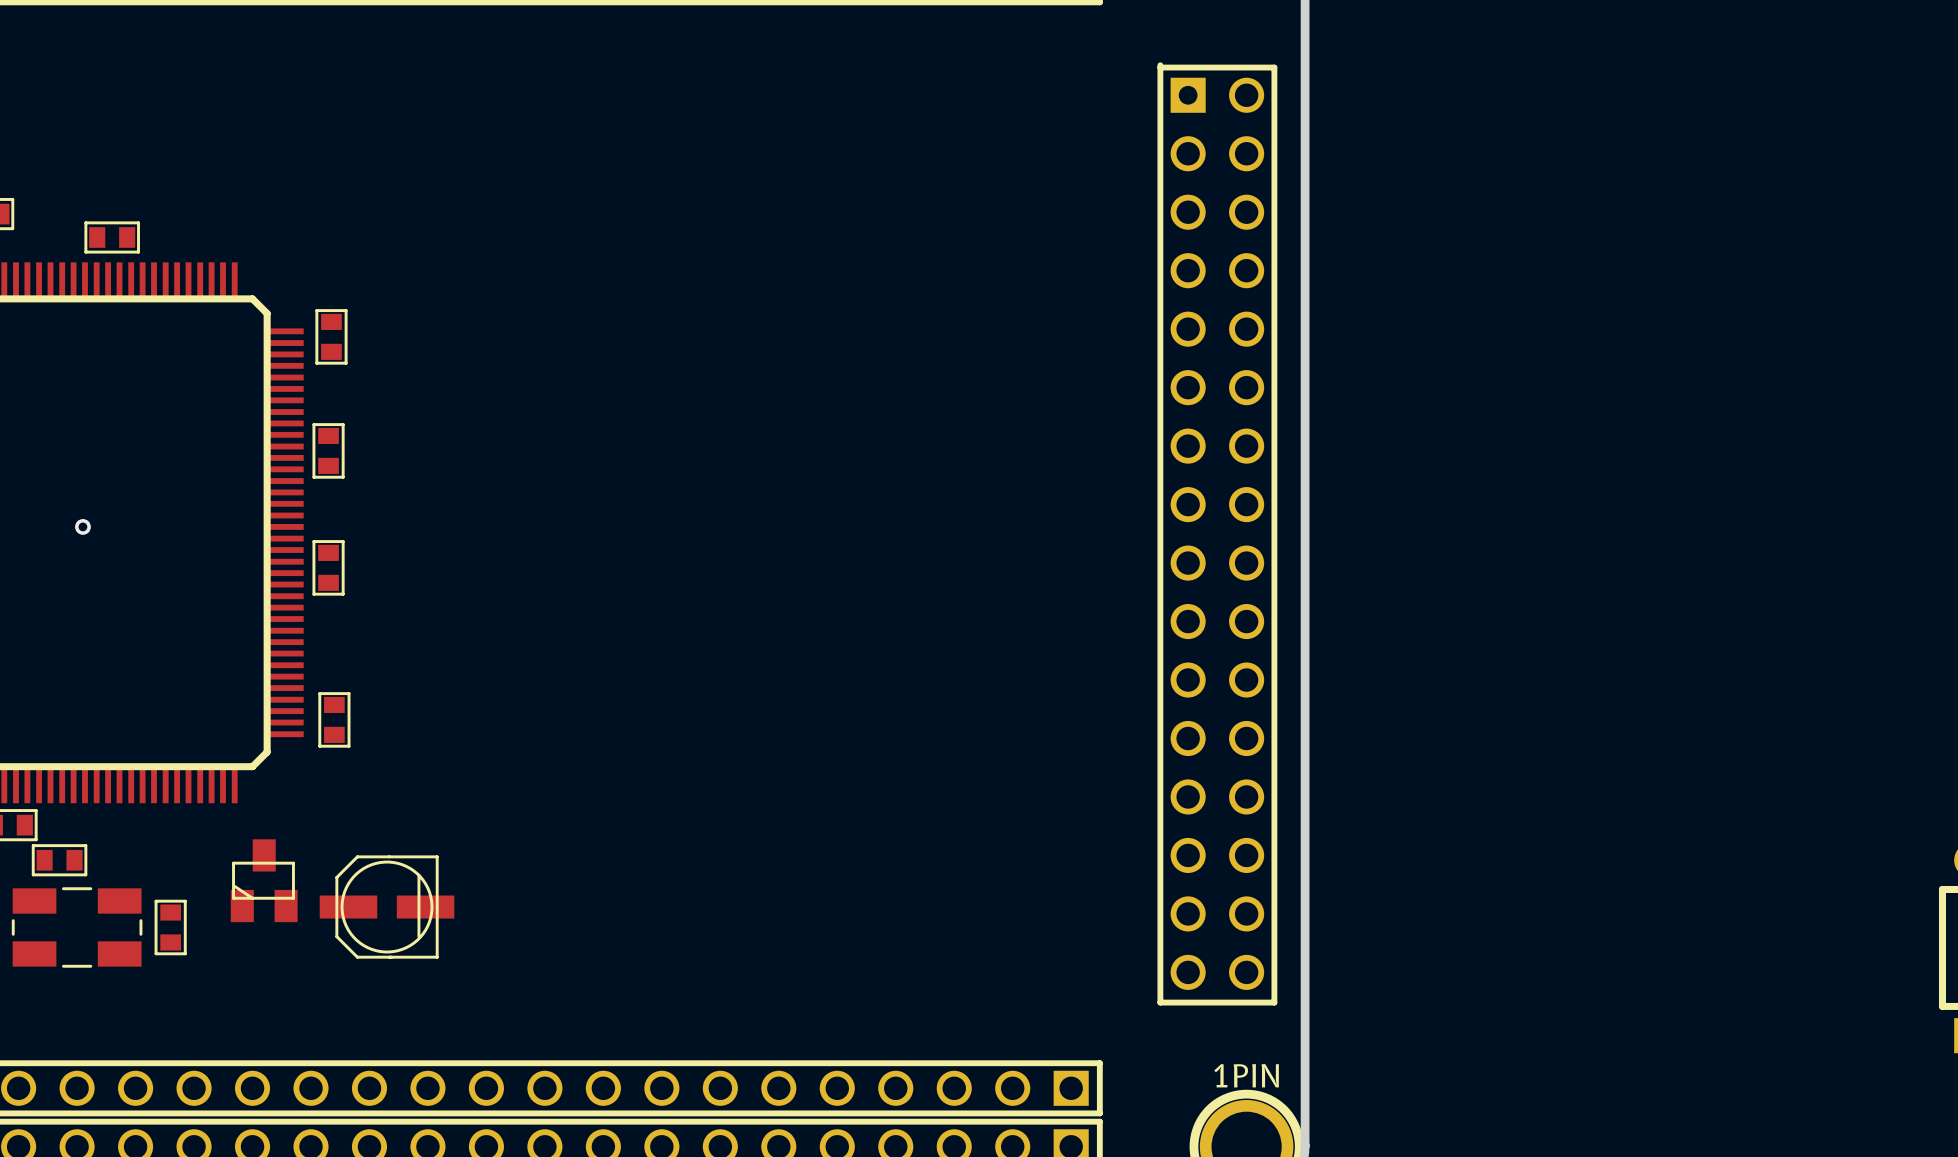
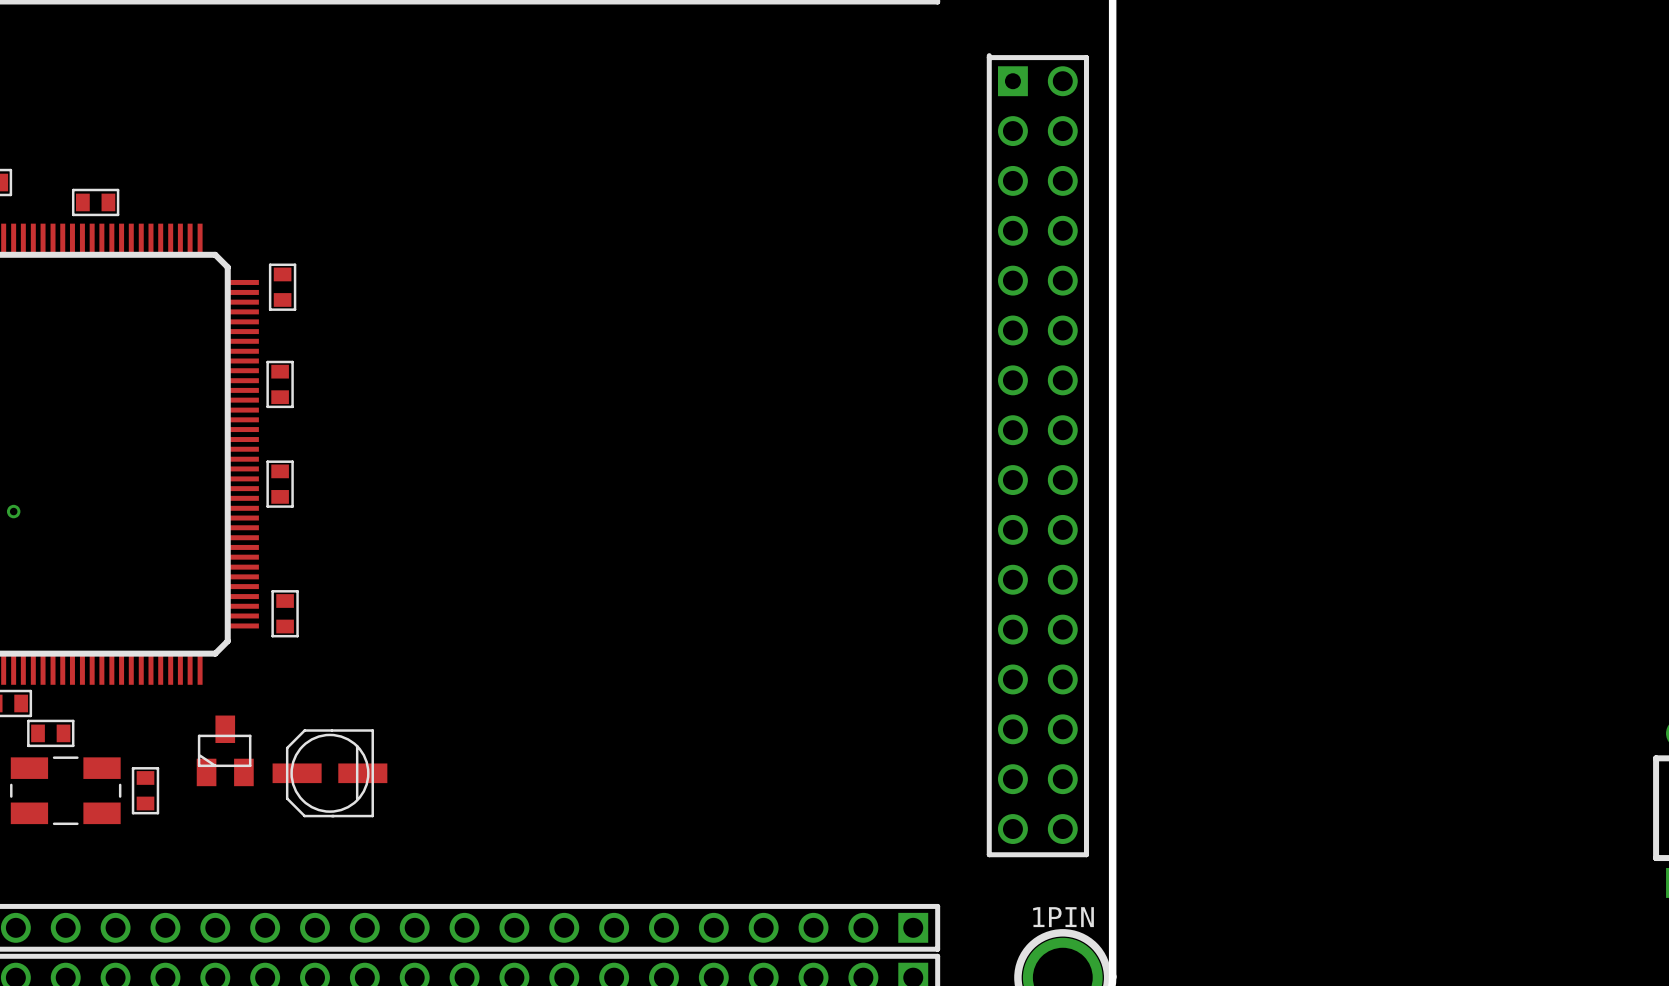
via position: (82, 526) -> (13, 511)

